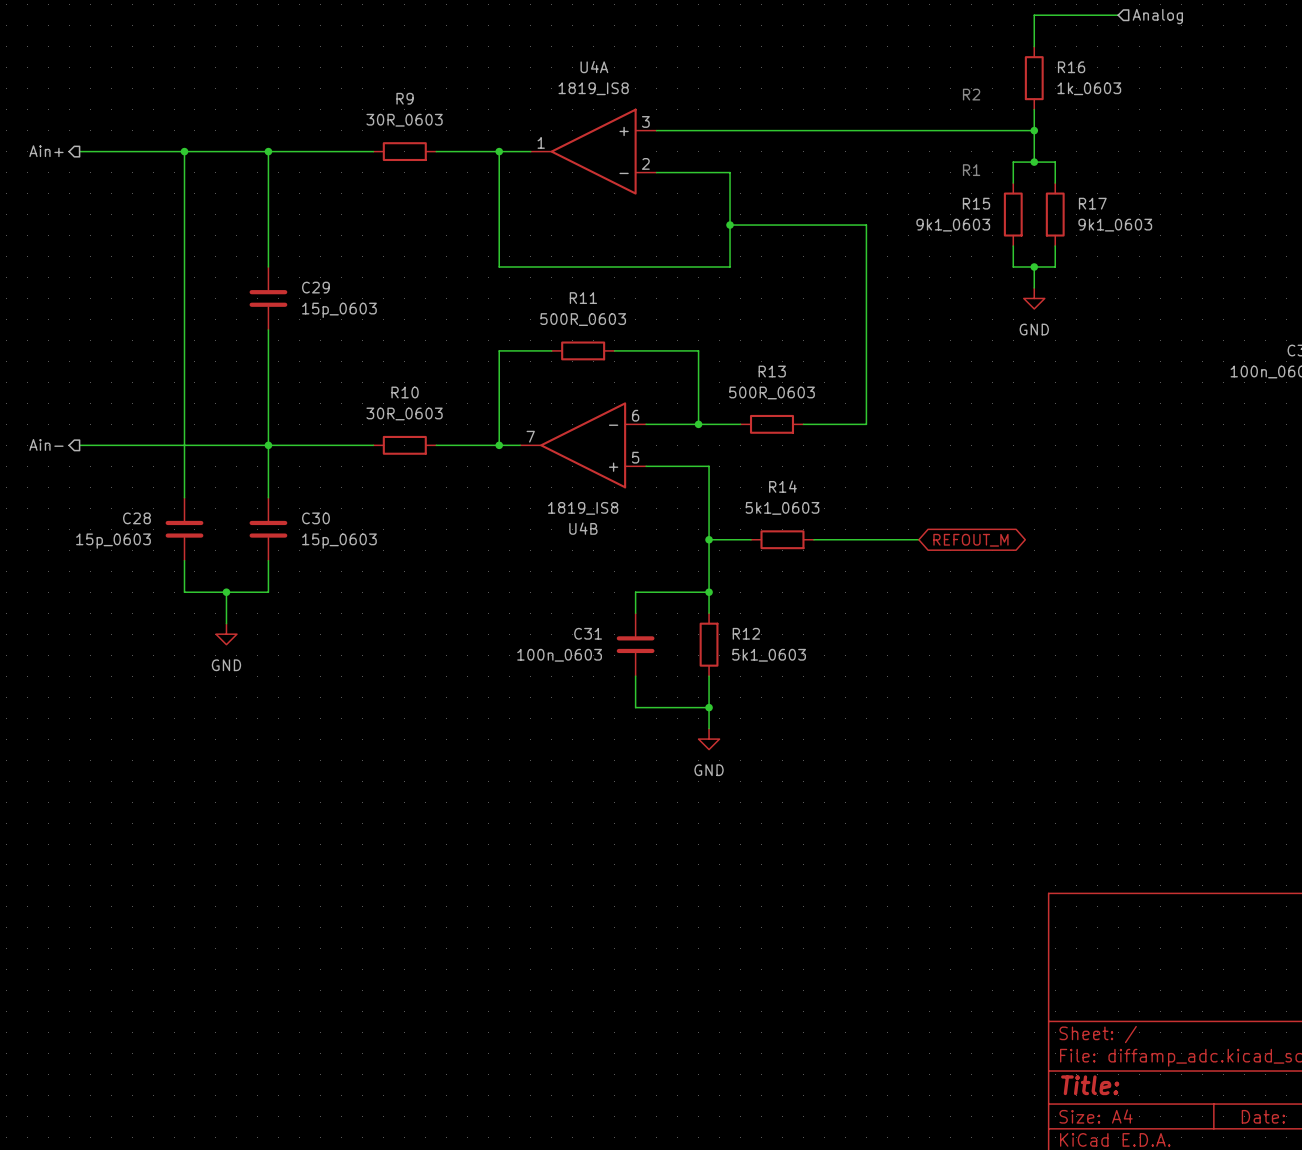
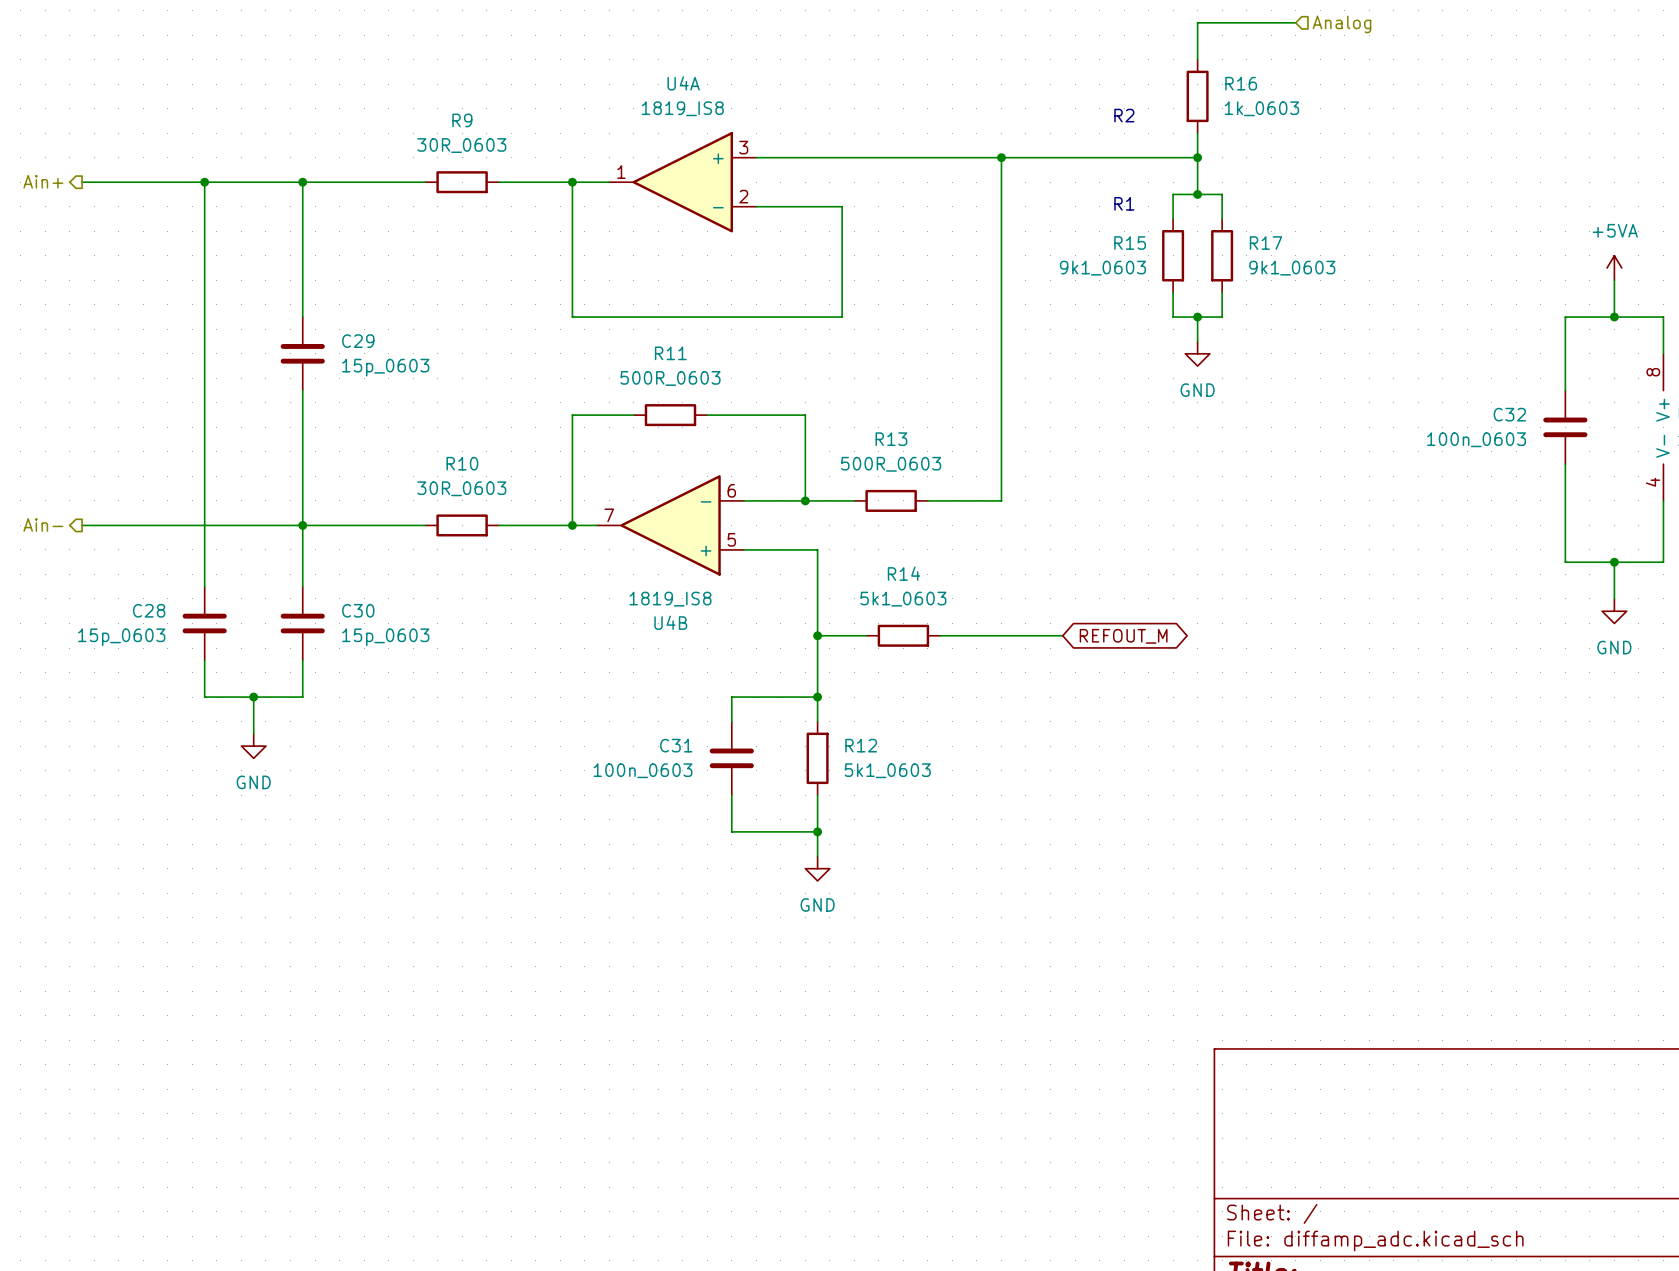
junction: none -> (1001, 157)
wire: (730, 225) (866, 225) -> (1001, 157) (1001, 268)
junction: (730, 225) -> none

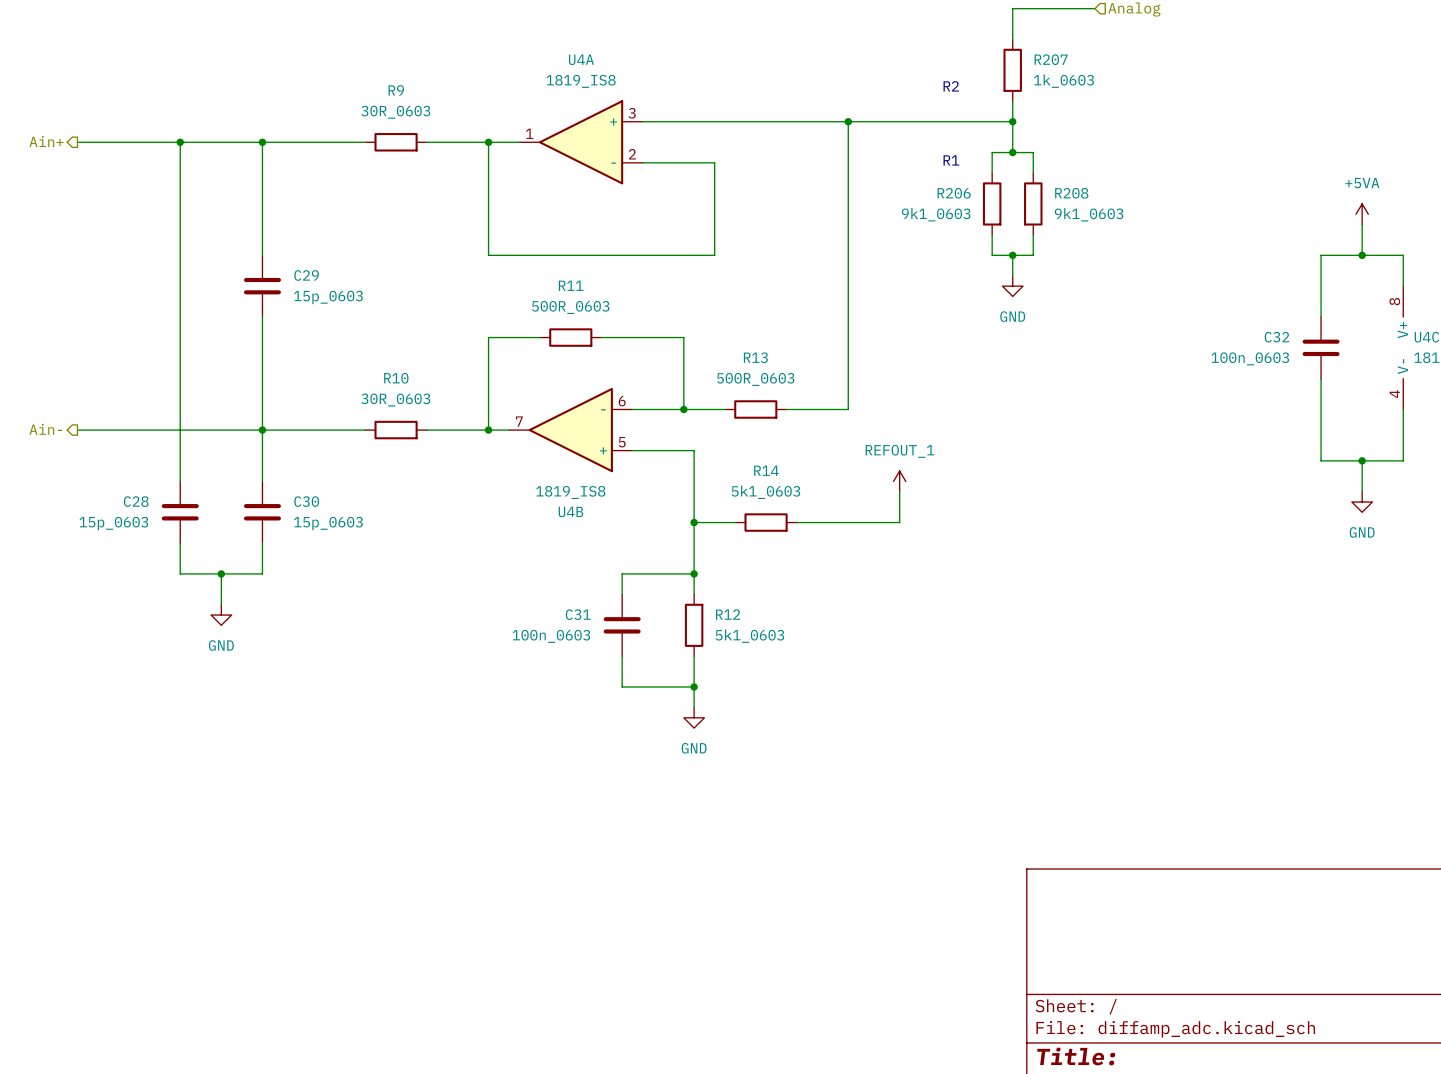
R16 name: R16 (1241, 83) -> R207 (1051, 59)
R15 name: R15 (1130, 243) -> R206 (954, 193)
R17 name: R17 (1266, 243) -> R208 (1071, 193)
power symbol: none -> REFOUT_1 (899, 481)
wire: none -> (899, 491) (899, 522)
global label: REFOUT_M (1123, 636) -> none

